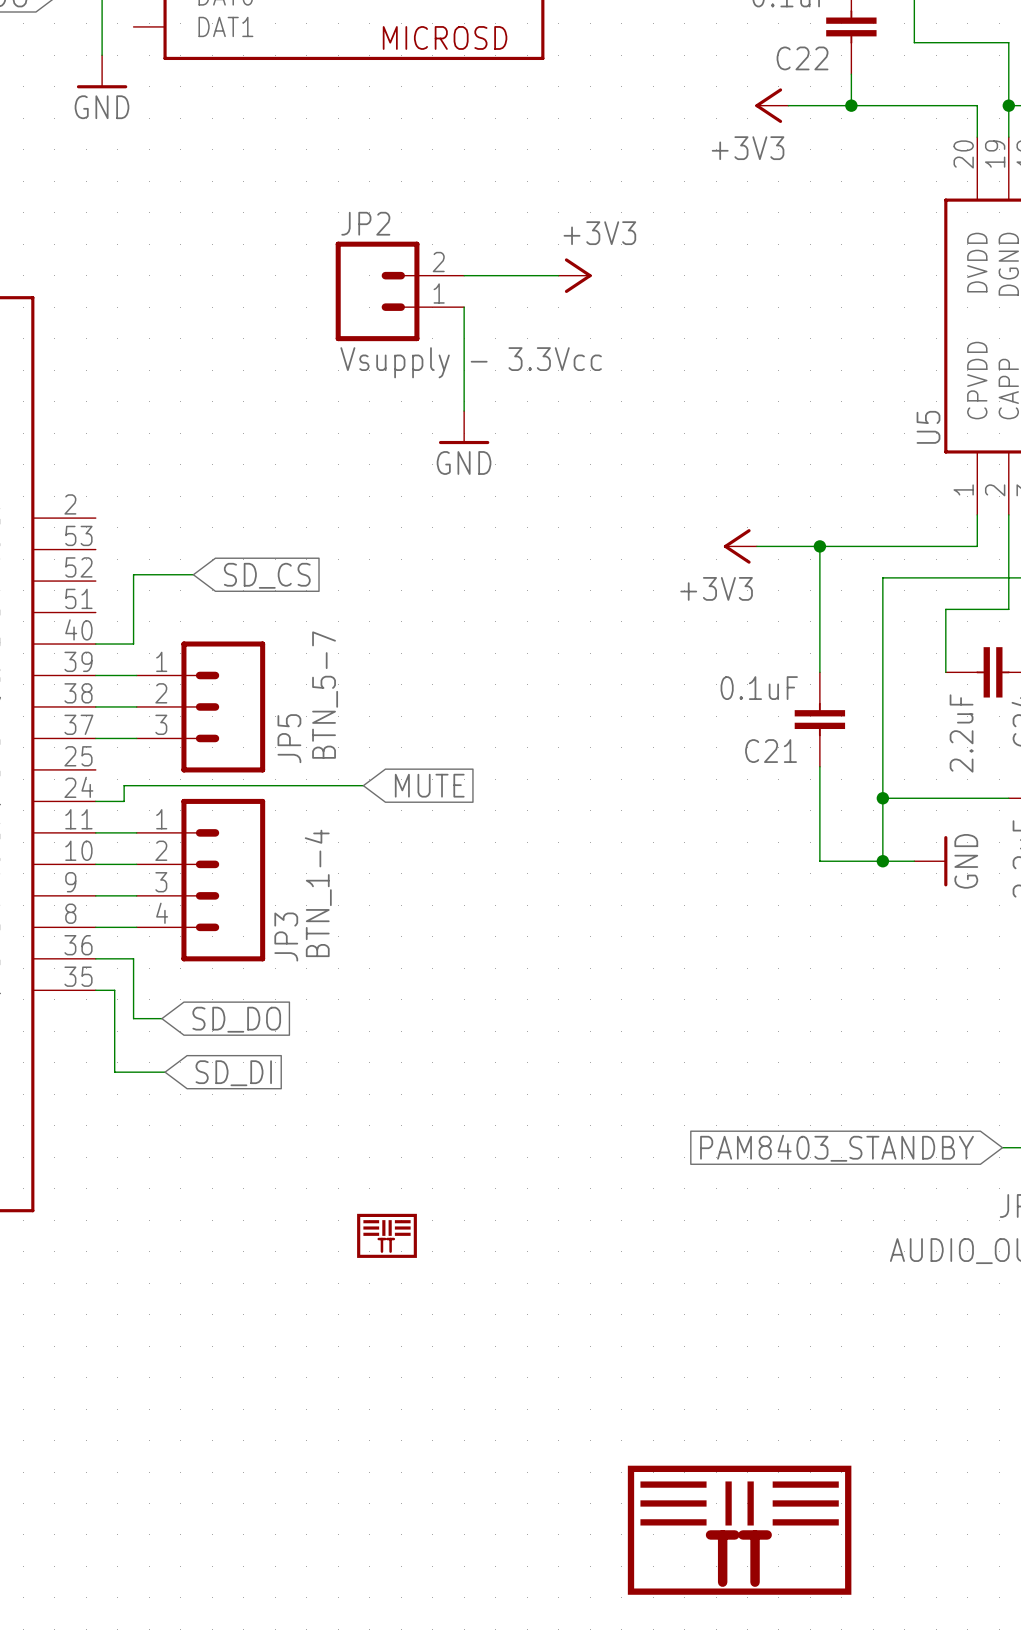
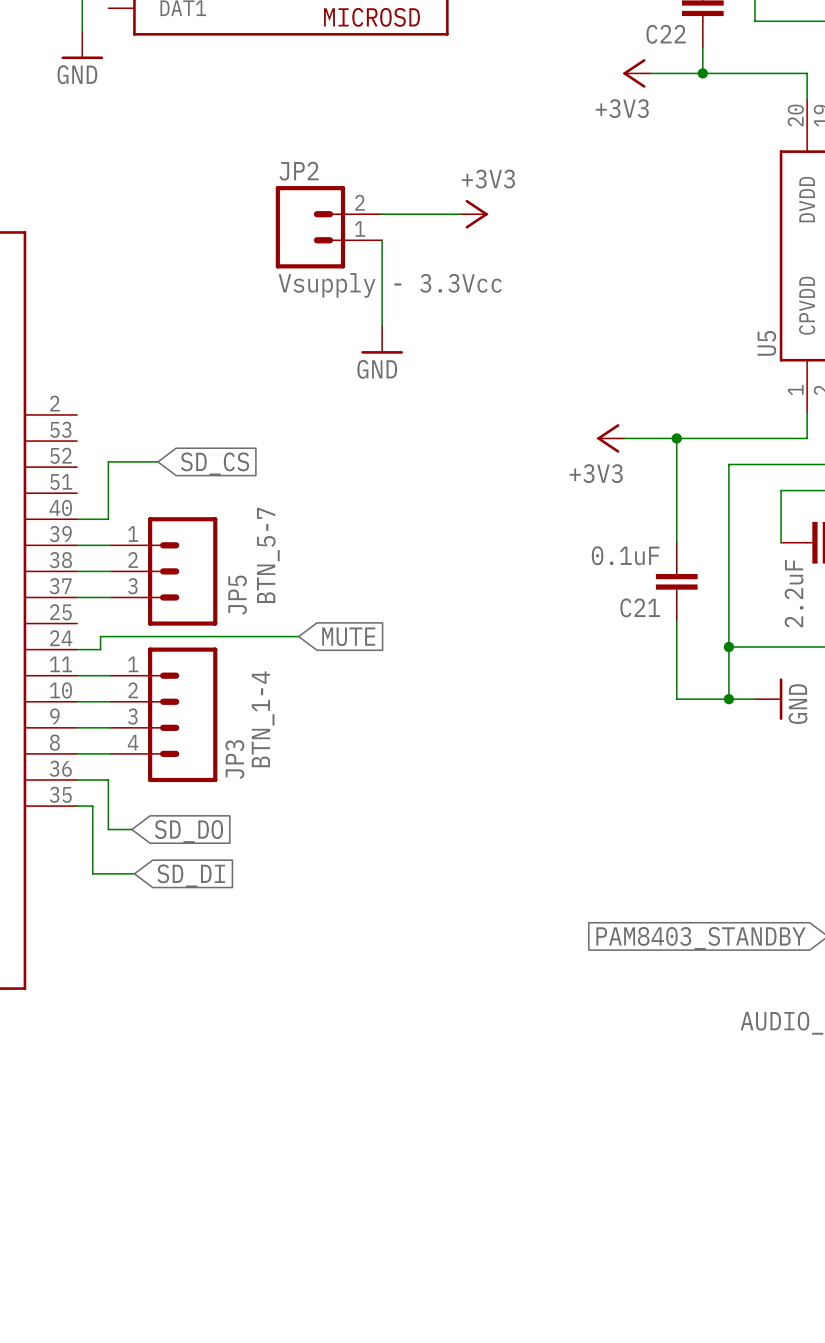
drawing: [357, 1213, 417, 1258] -> none
text: TT (386, 1245) -> none
drawing: [627, 1465, 852, 1595] -> none
text: TT (738, 1558) -> none

